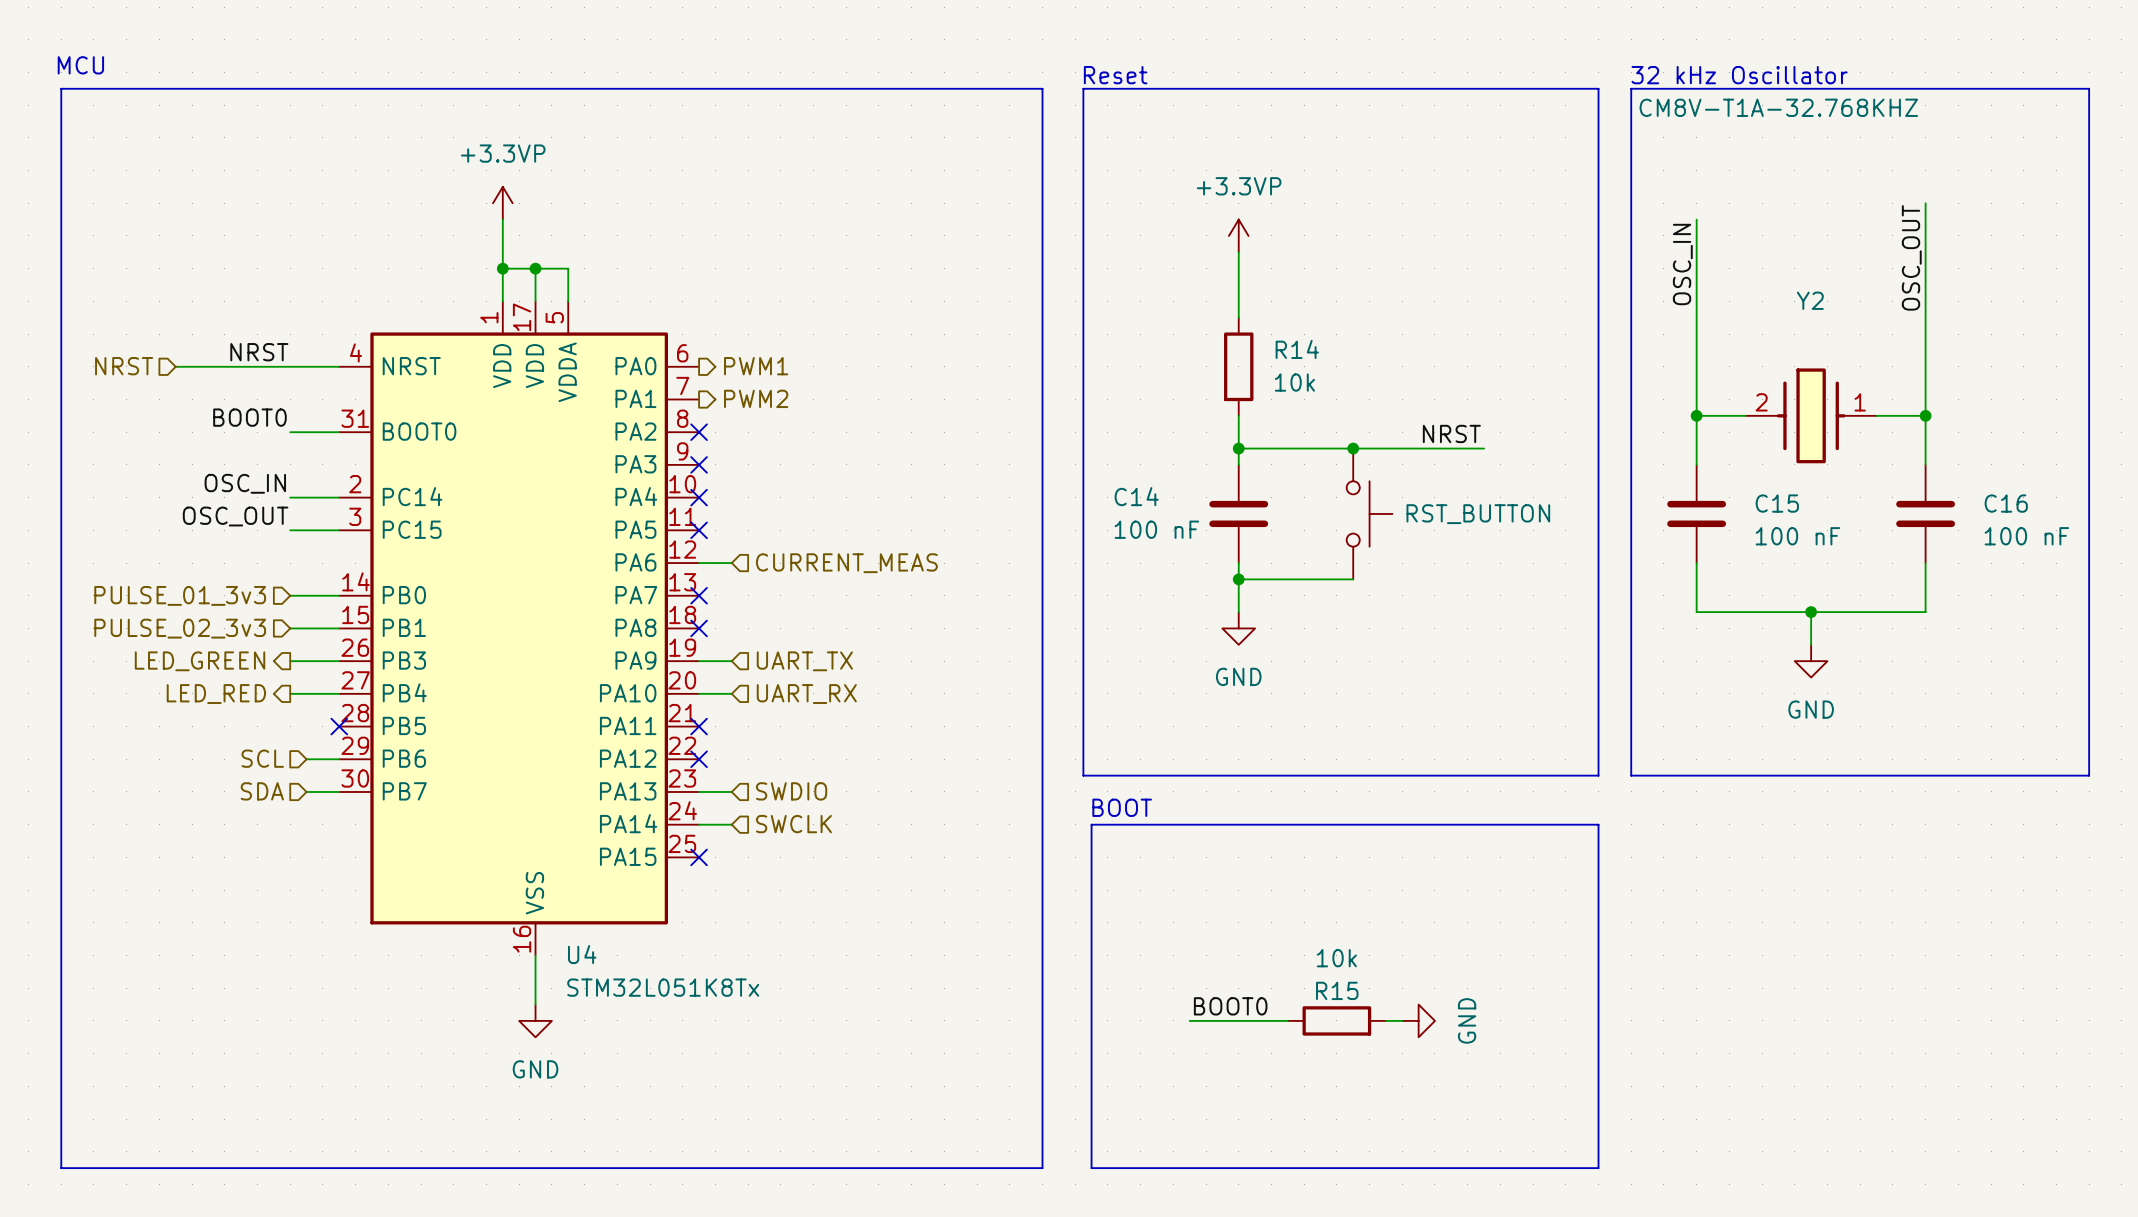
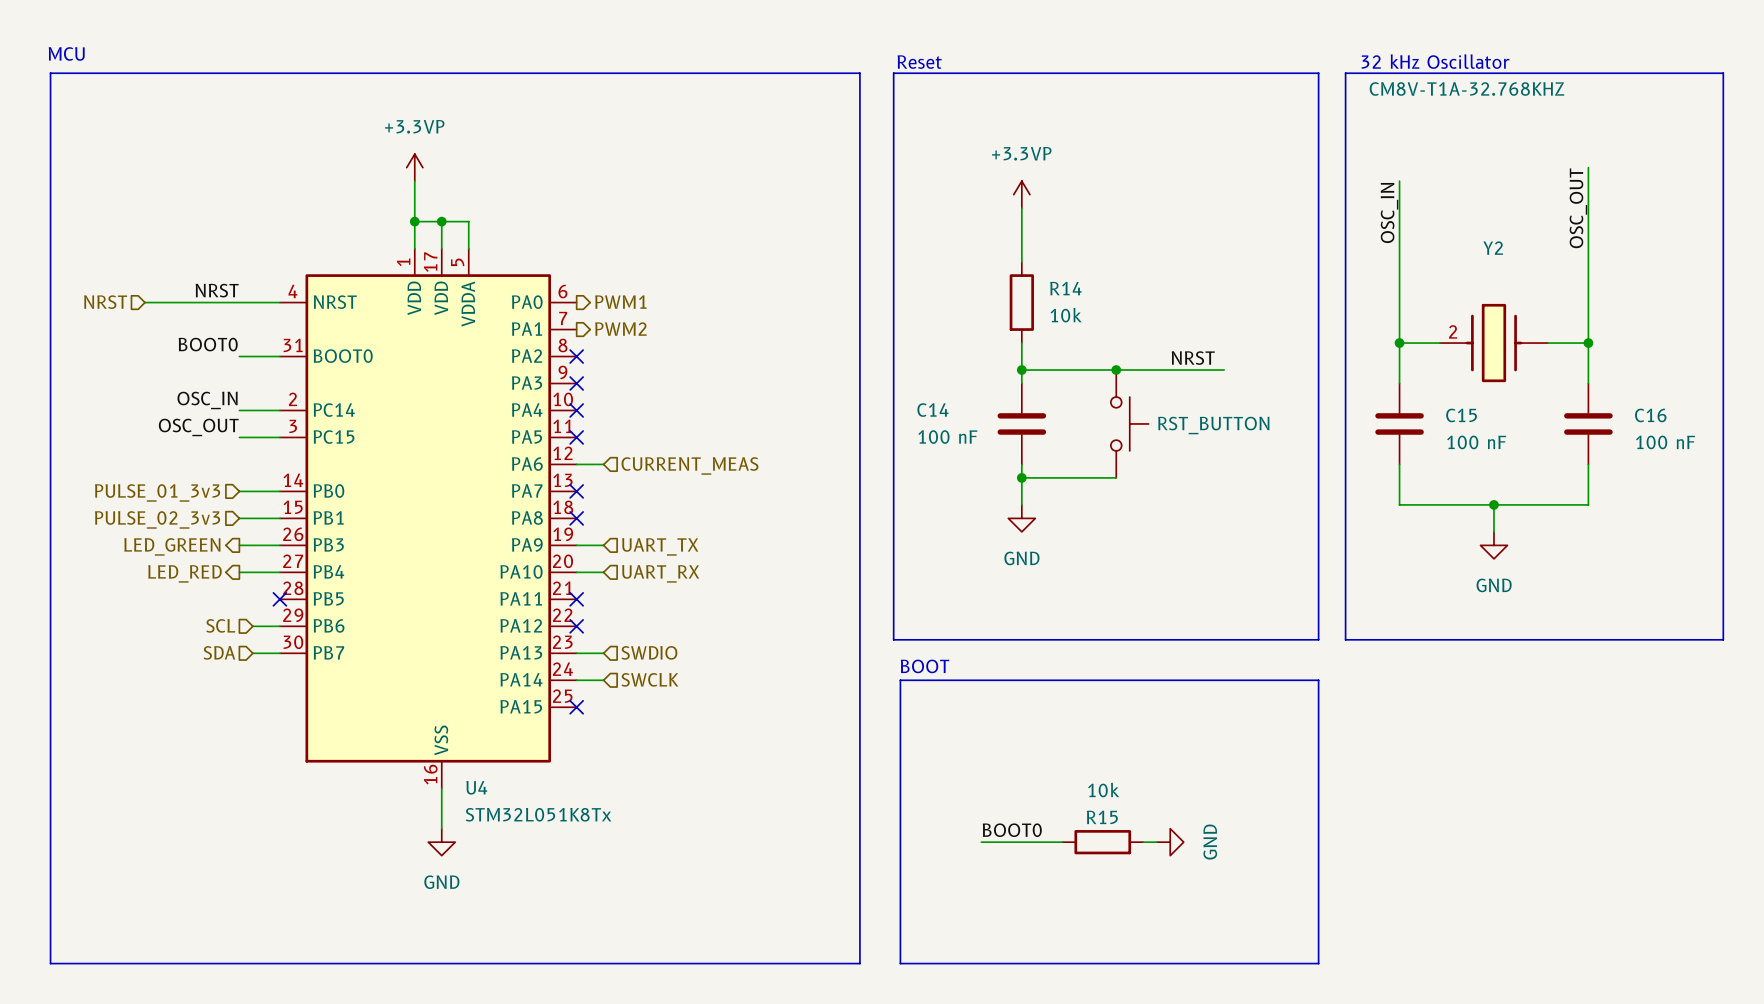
Y2 pin number: 1 (1860, 402) -> none

